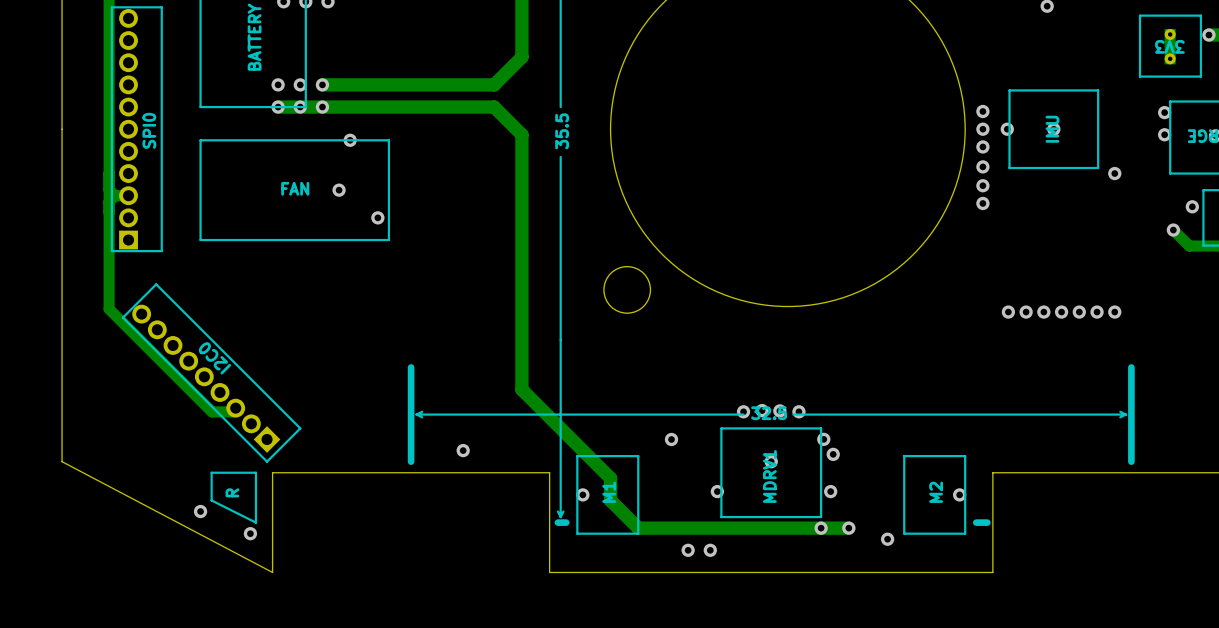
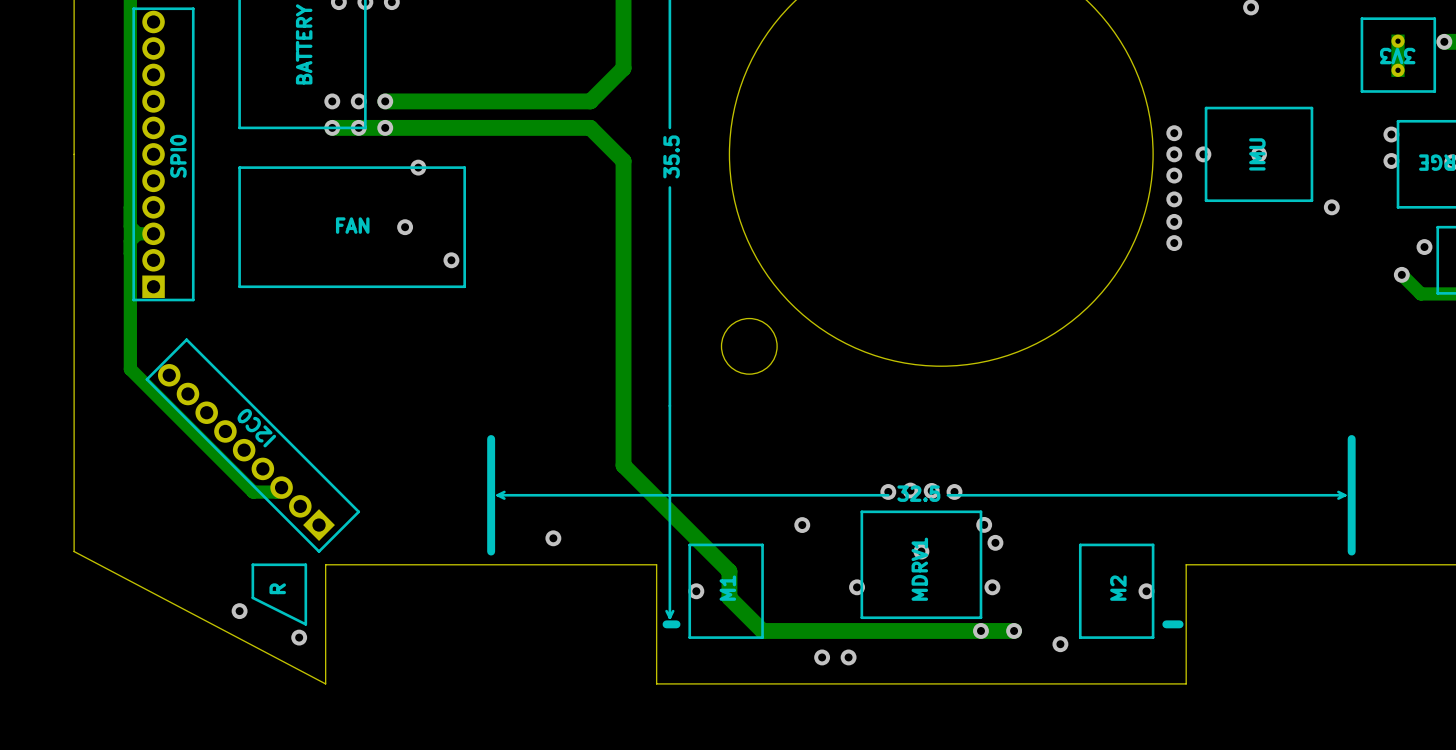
via: (1008, 312) -> none
via: (1026, 312) -> none
via: (1043, 312) -> none
via: (1061, 312) -> none
via: (1079, 312) -> none
via: (1097, 312) -> none
via: (1114, 312) -> none

